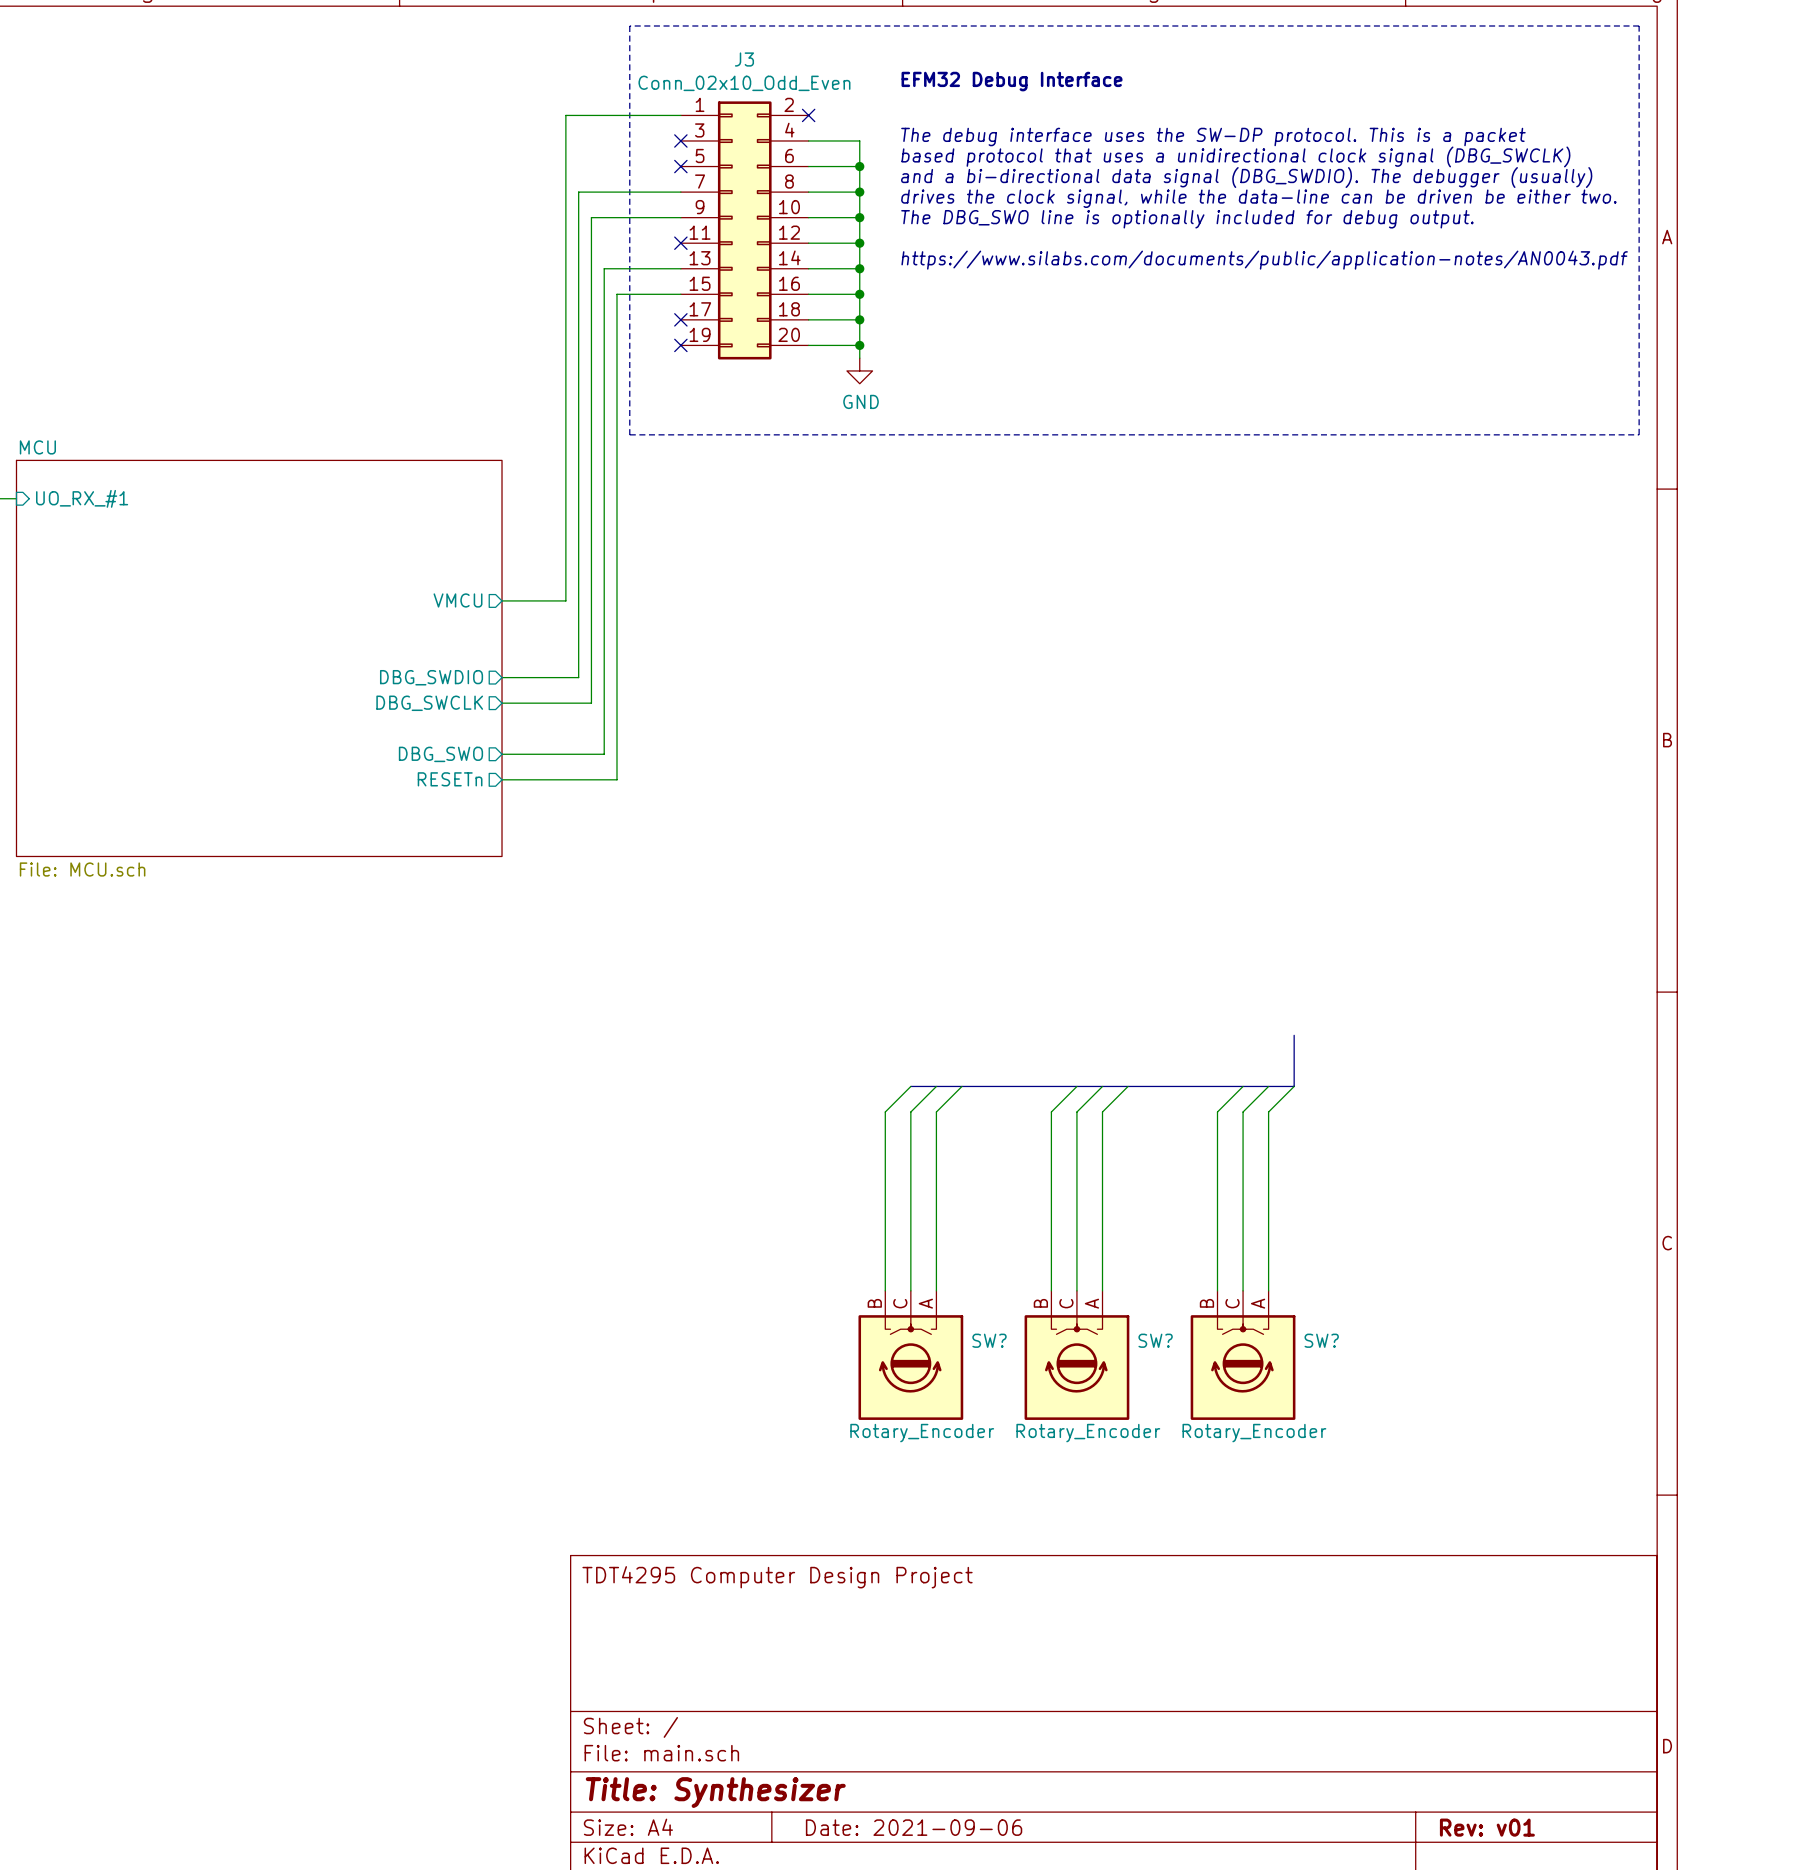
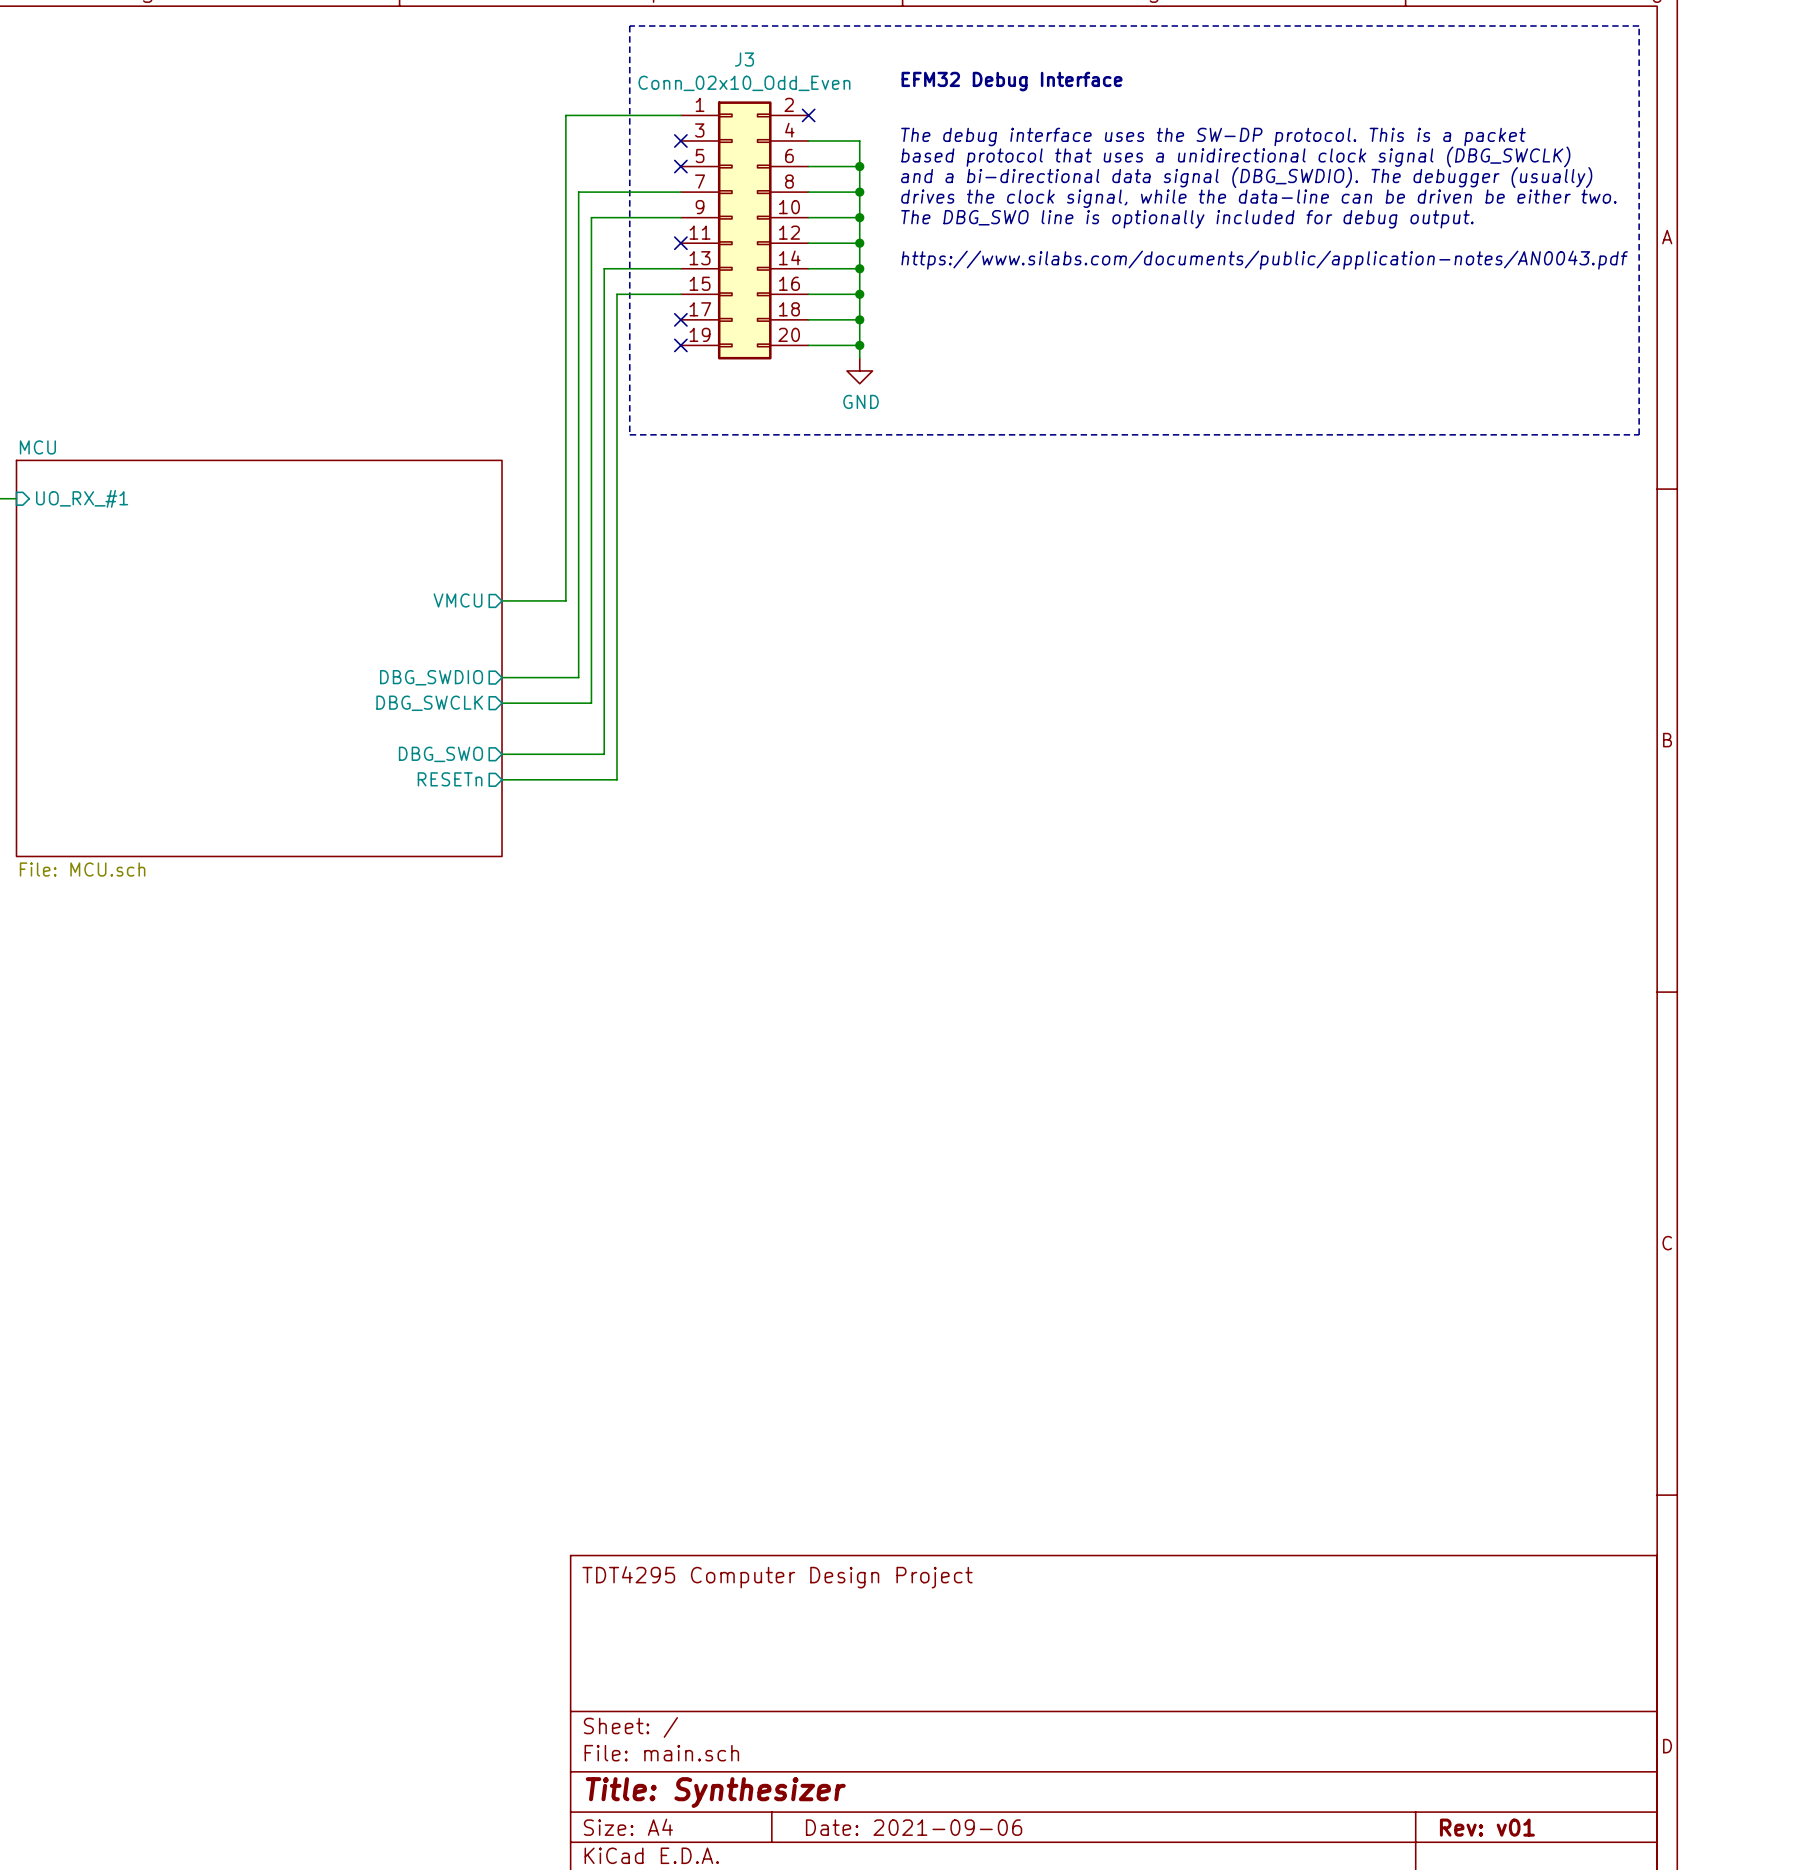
bus: (1294, 1035) (1294, 1086) (910, 1086) -> none
wire: (910, 1086) (885, 1112) (885, 1290) -> none
wire: (936, 1086) (910, 1112) (910, 1290) -> none
wire: (961, 1086) (936, 1112) (936, 1290) -> none
wire: (1076, 1086) (1051, 1112) (1051, 1290) -> none
wire: (1102, 1086) (1076, 1112) (1076, 1290) -> none
wire: (1128, 1086) (1102, 1112) (1102, 1290) -> none
wire: (1243, 1086) (1217, 1112) (1217, 1290) -> none
wire: (1268, 1086) (1243, 1112) (1243, 1290) -> none
wire: (1294, 1086) (1268, 1112) (1268, 1290) -> none
SW?: Rotary_Encoder (910, 1355) -> none
SW?: Rotary_Encoder (1076, 1355) -> none
SW?: Rotary_Encoder (1243, 1355) -> none

